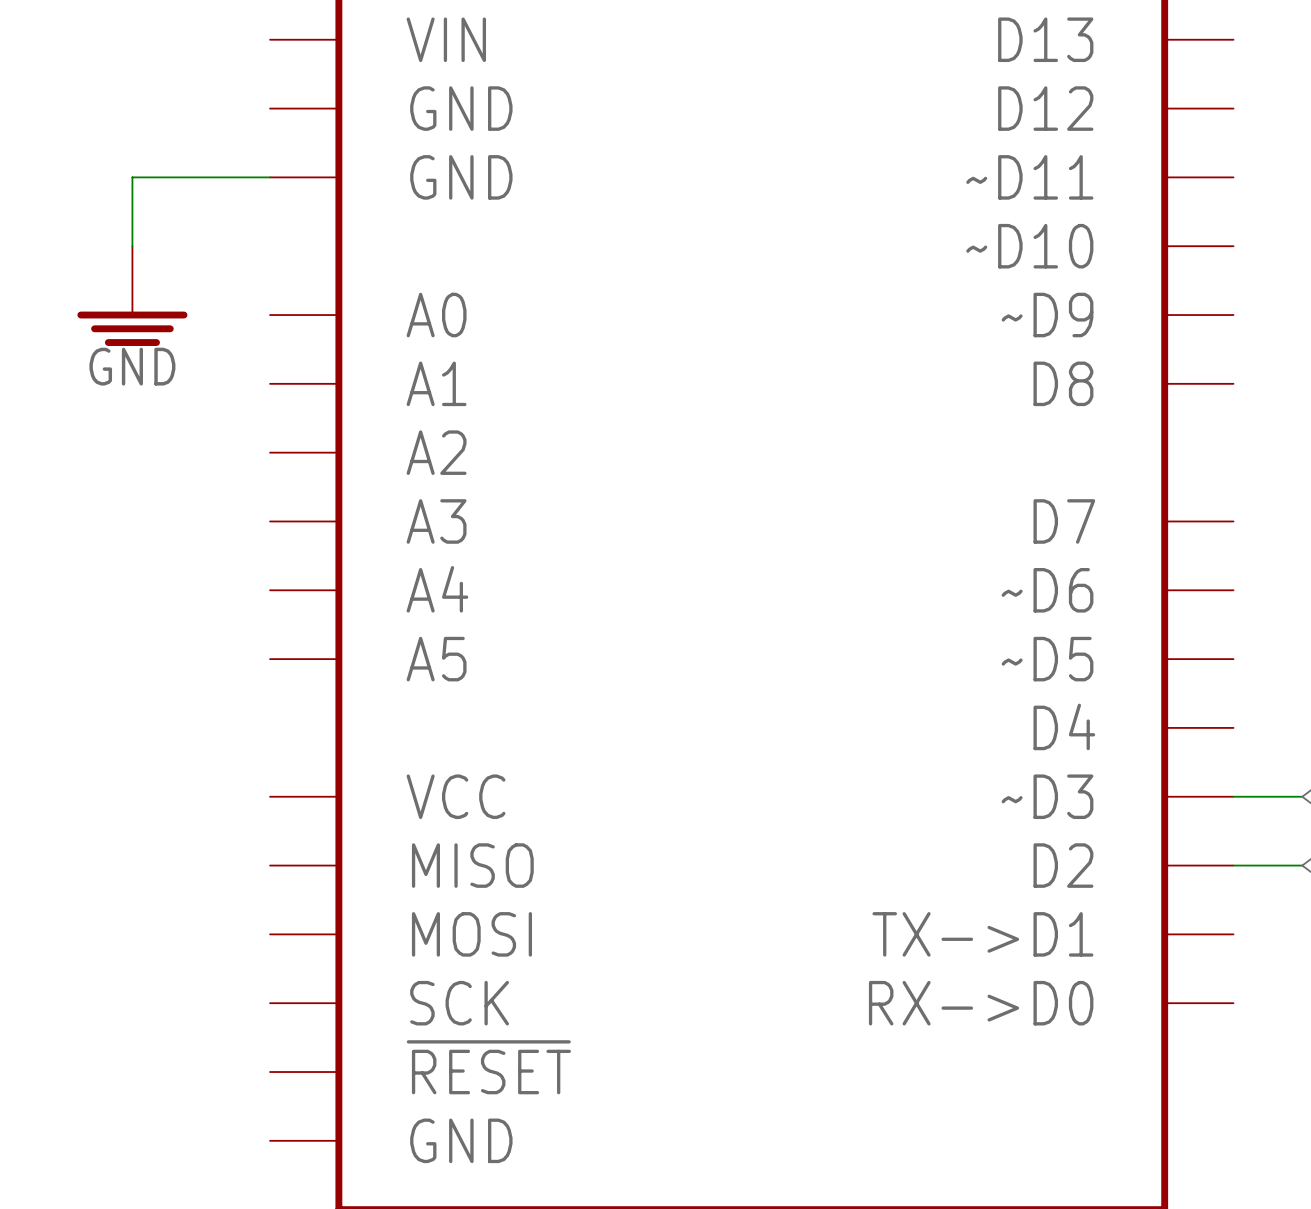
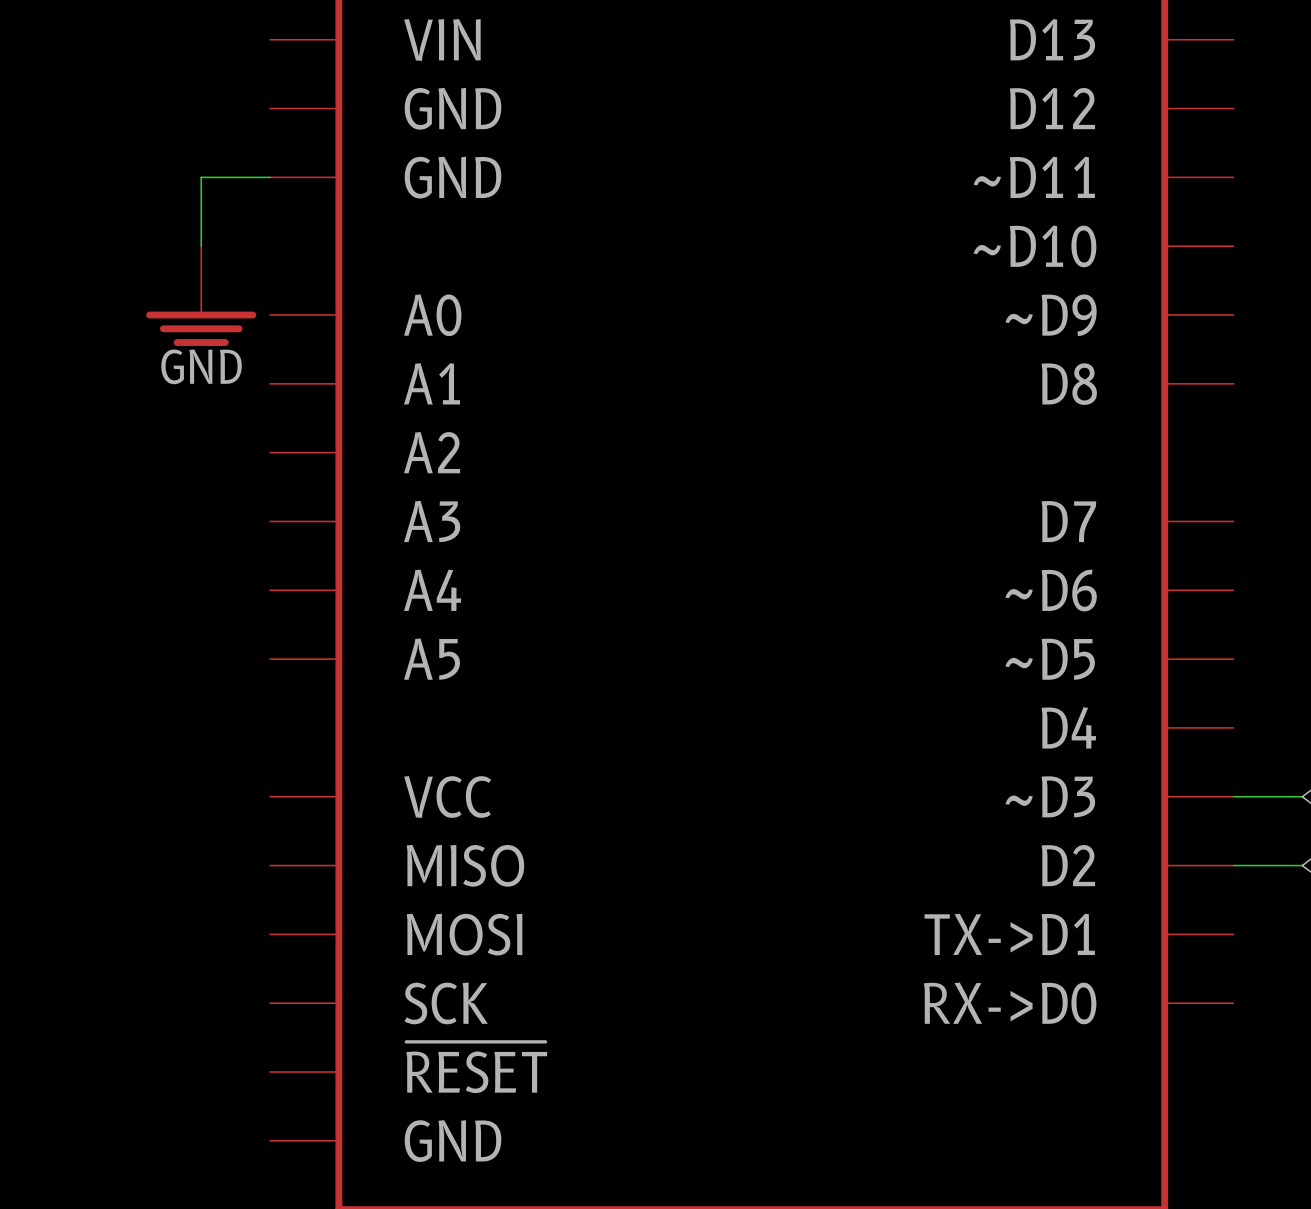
wire: (201, 177) (132, 177) (132, 246) -> (201, 177) (201, 246)
power symbol position: (132, 296) -> (201, 296)

